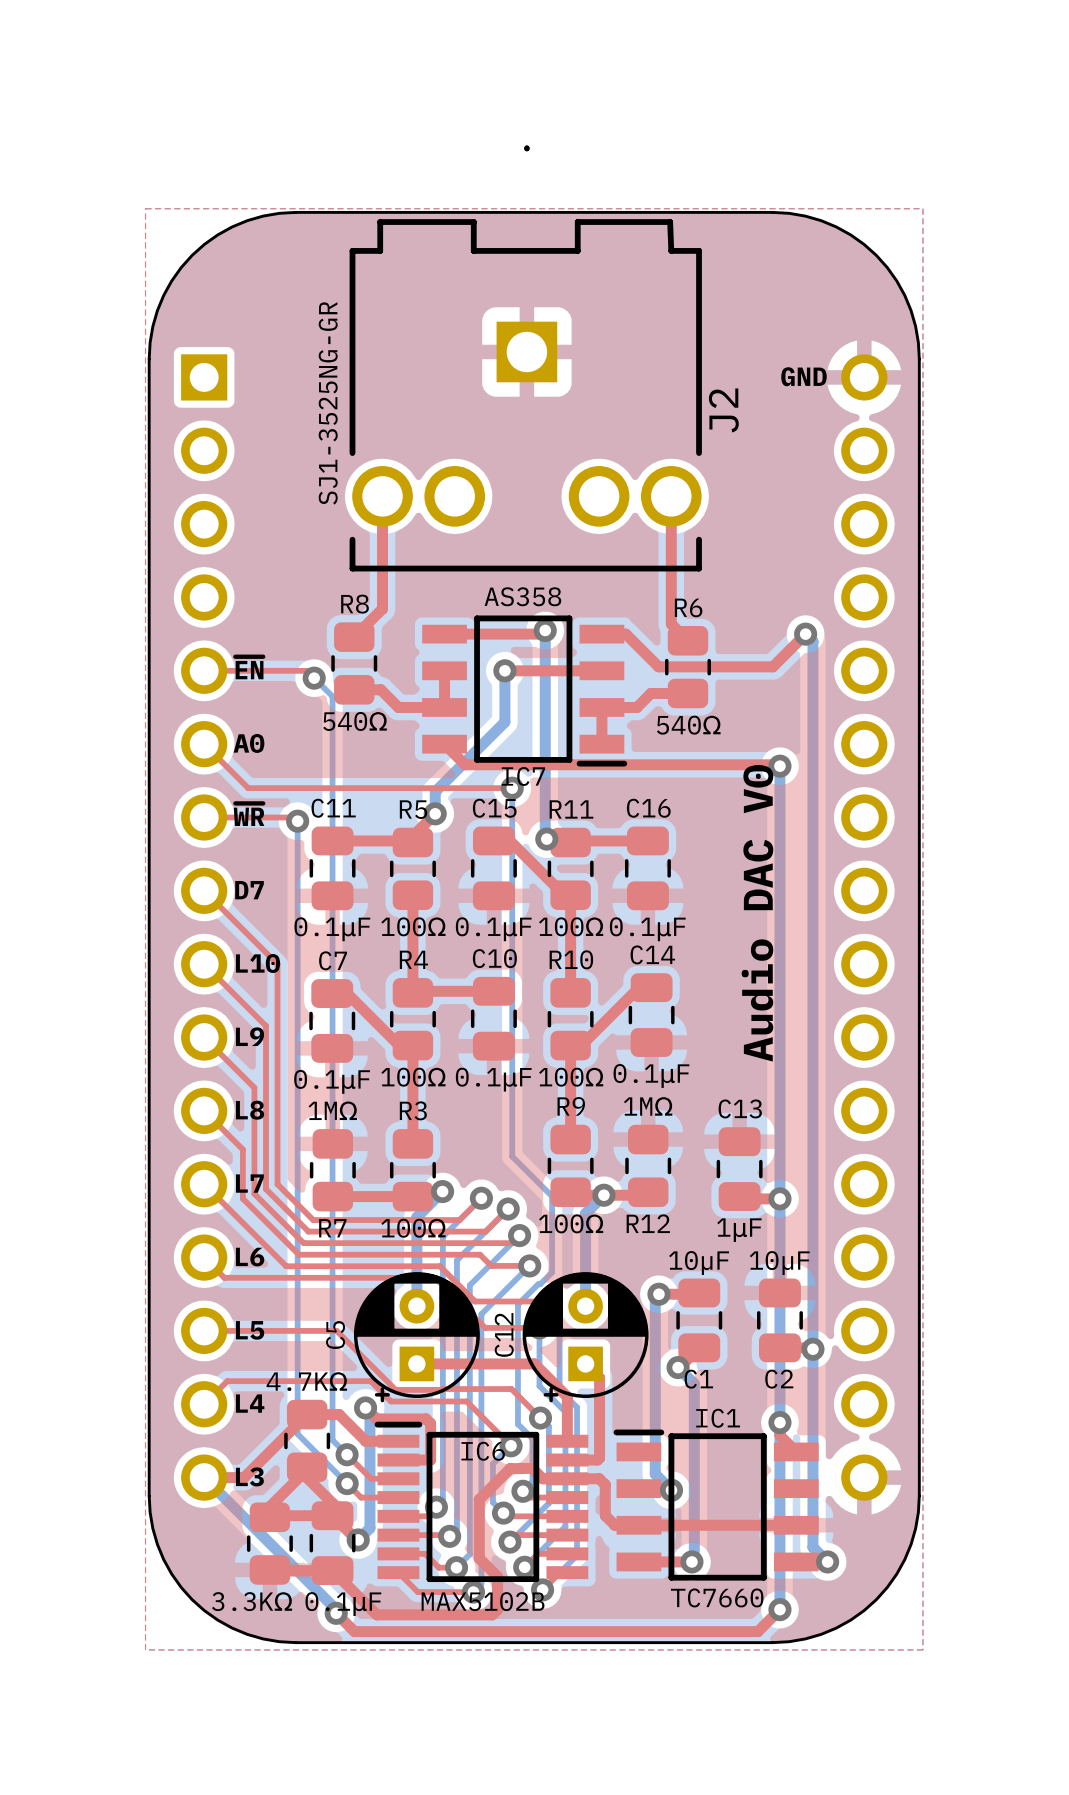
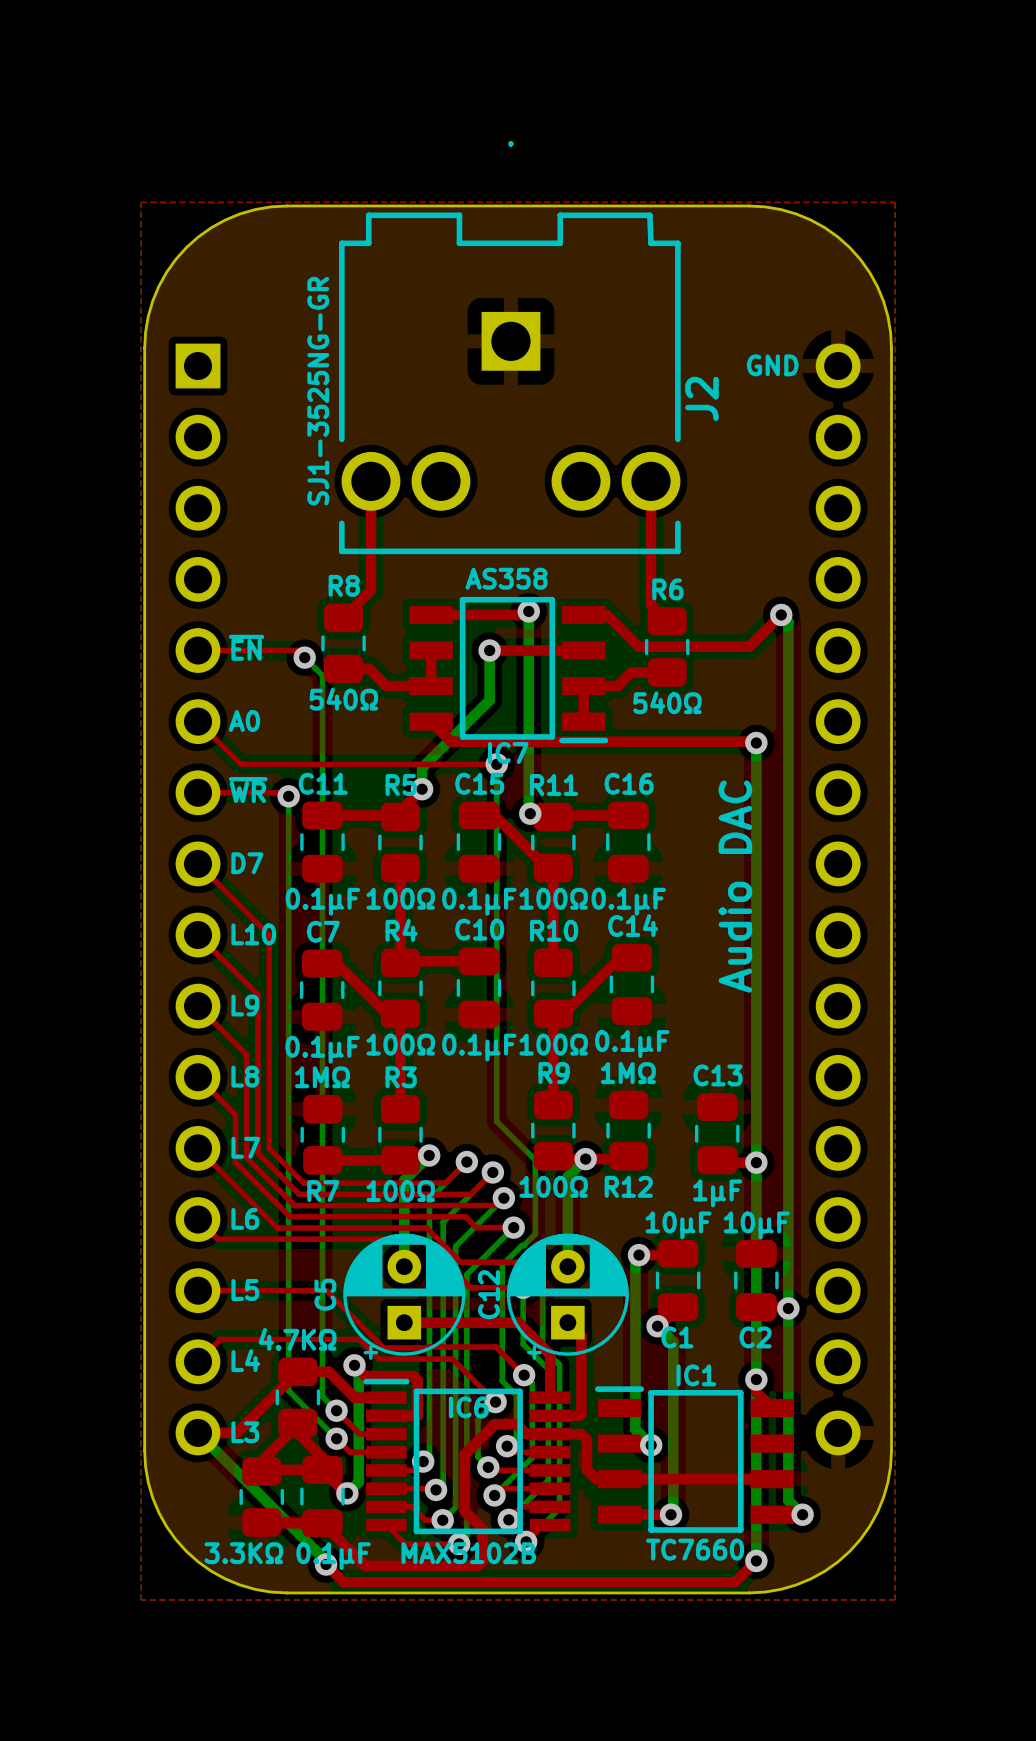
text: Audio DAC V0 (757, 913) -> Audio DAC (735, 886)

